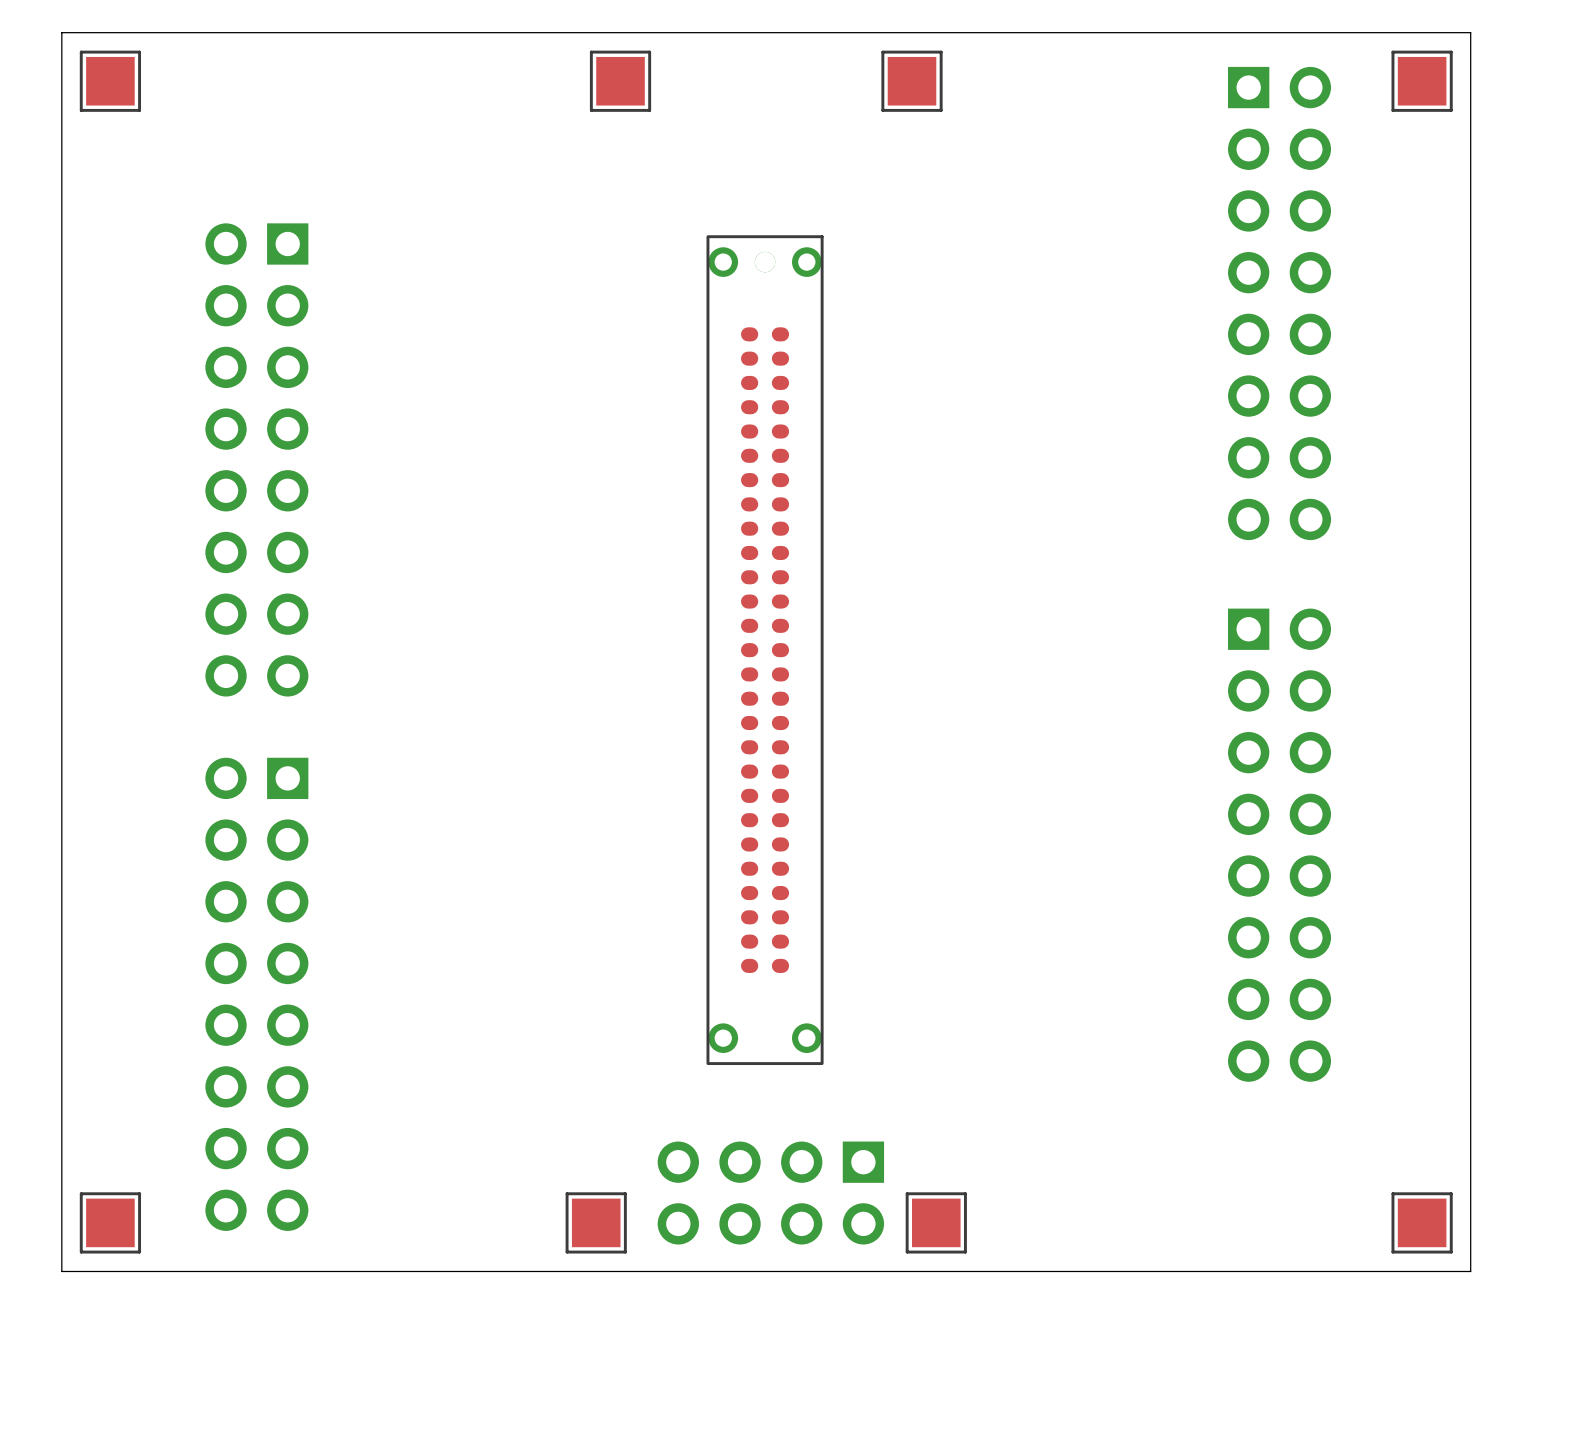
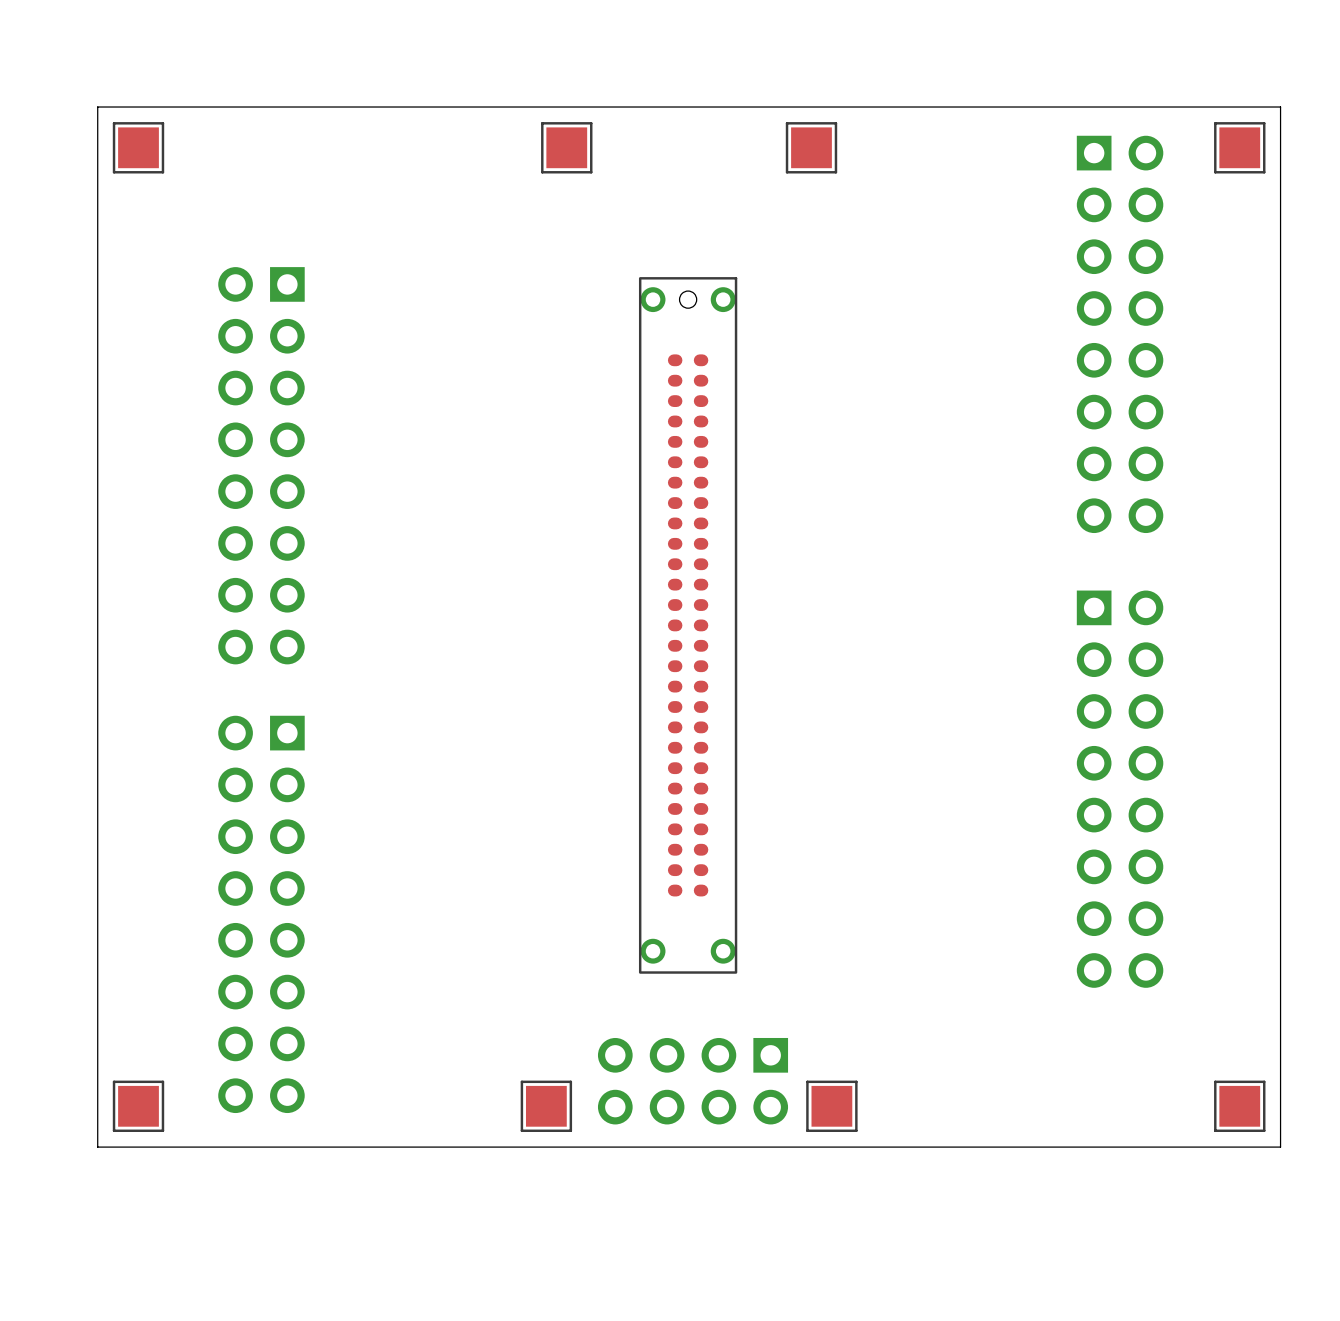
part footprint: [706, 235, 824, 1066] -> [638, 277, 738, 974]

